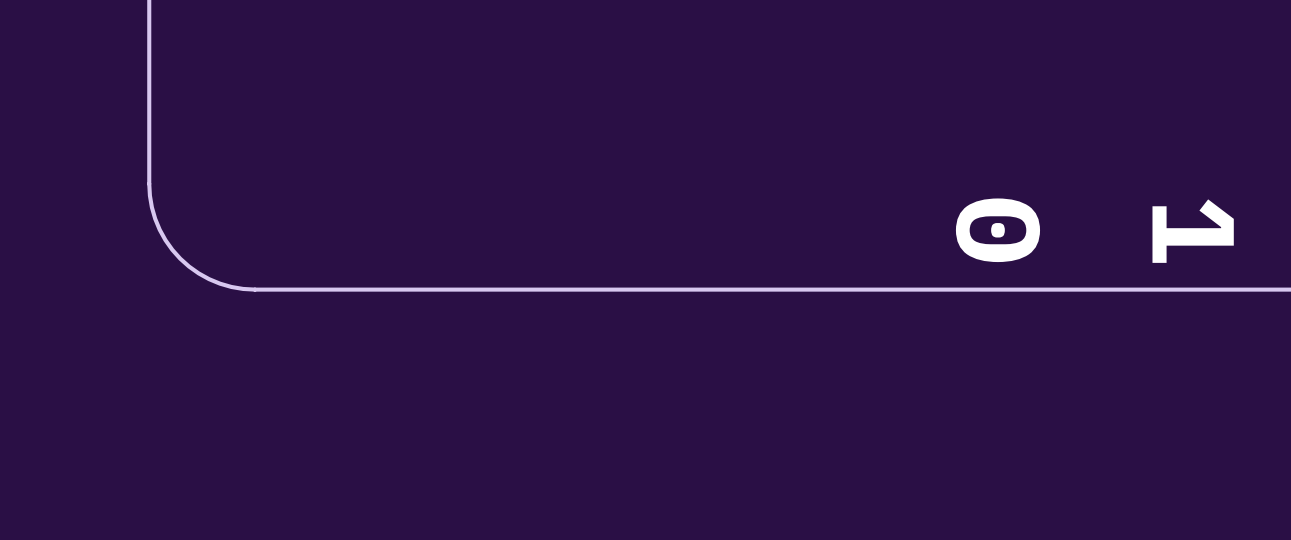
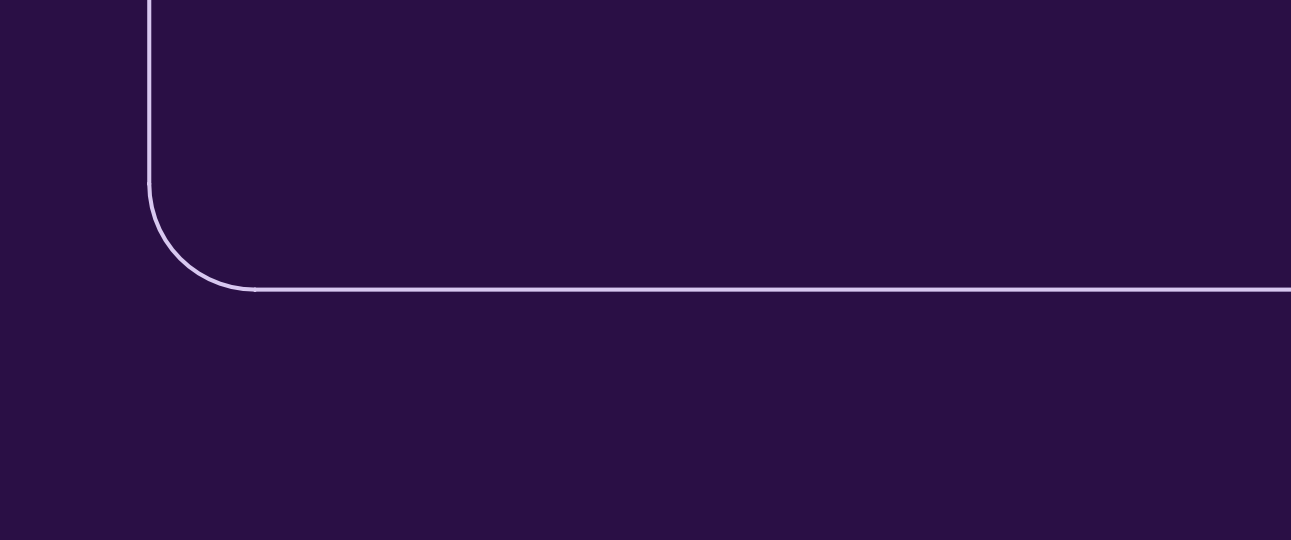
text: 0 (997, 230) -> none
text: 1 (1193, 231) -> none

